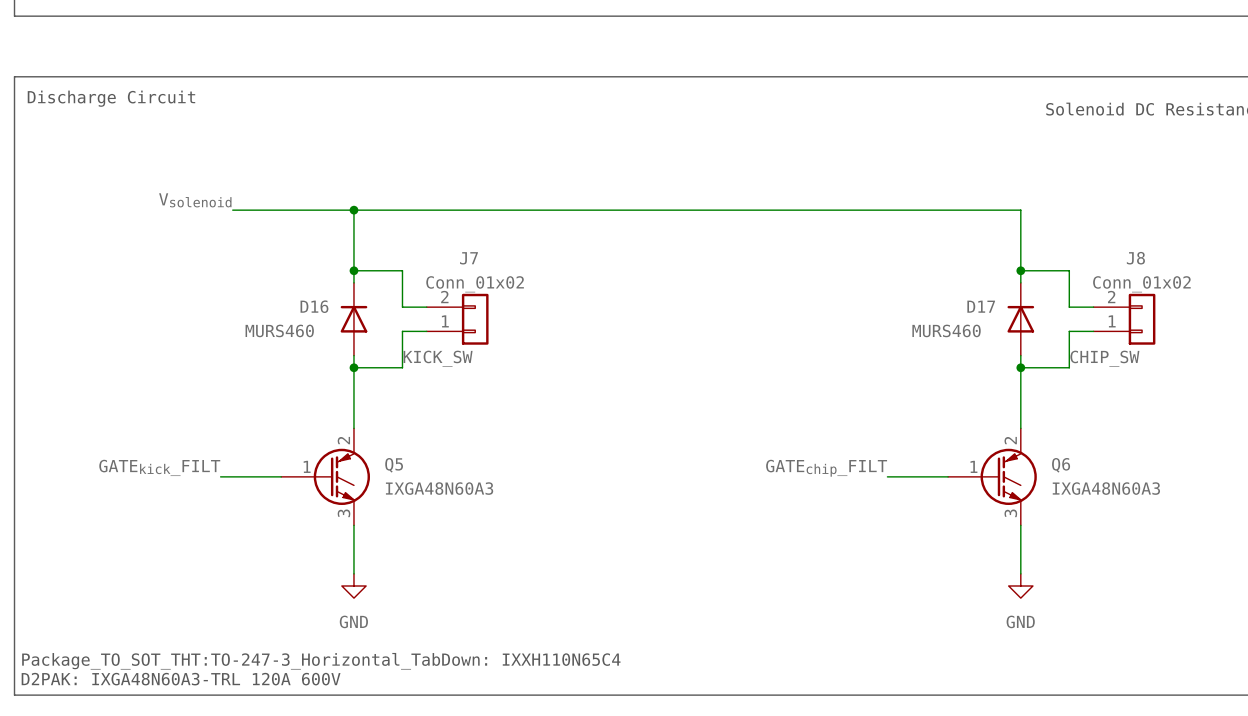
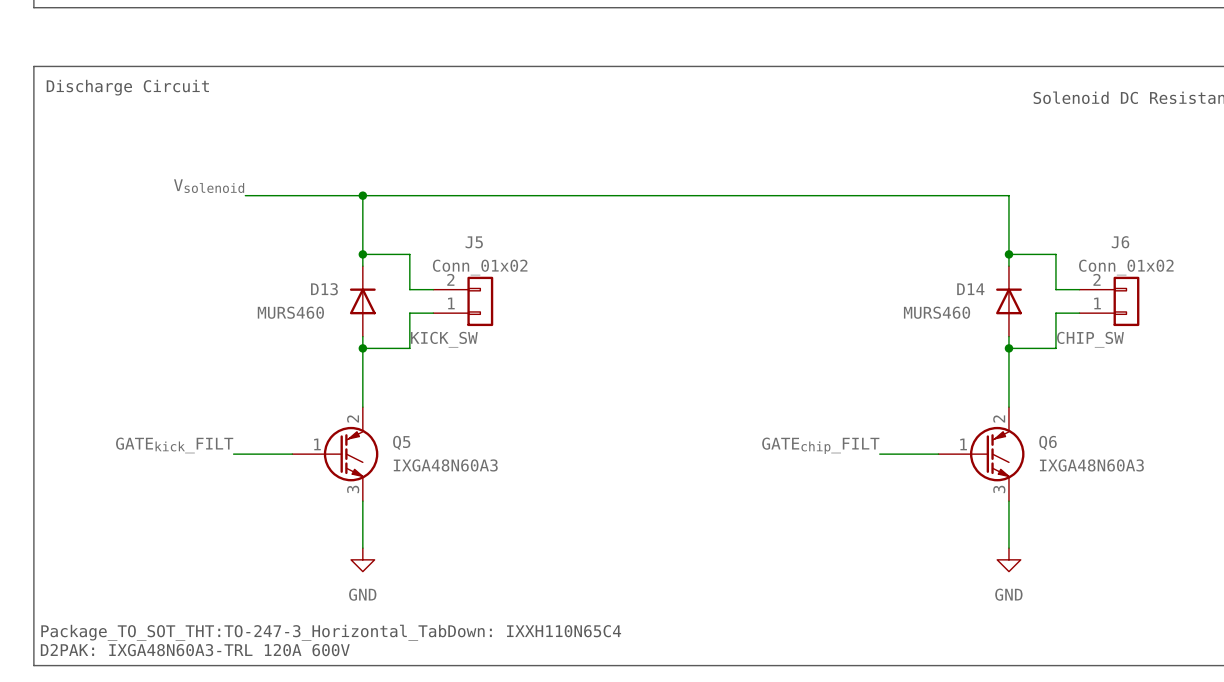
J7 name: J7 (468, 258) -> J5 (474, 242)
J8 name: J8 (1135, 258) -> J6 (1120, 242)
D16 name: D16 (314, 306) -> D13 (324, 289)
D17 name: D17 (981, 306) -> D14 (970, 289)

